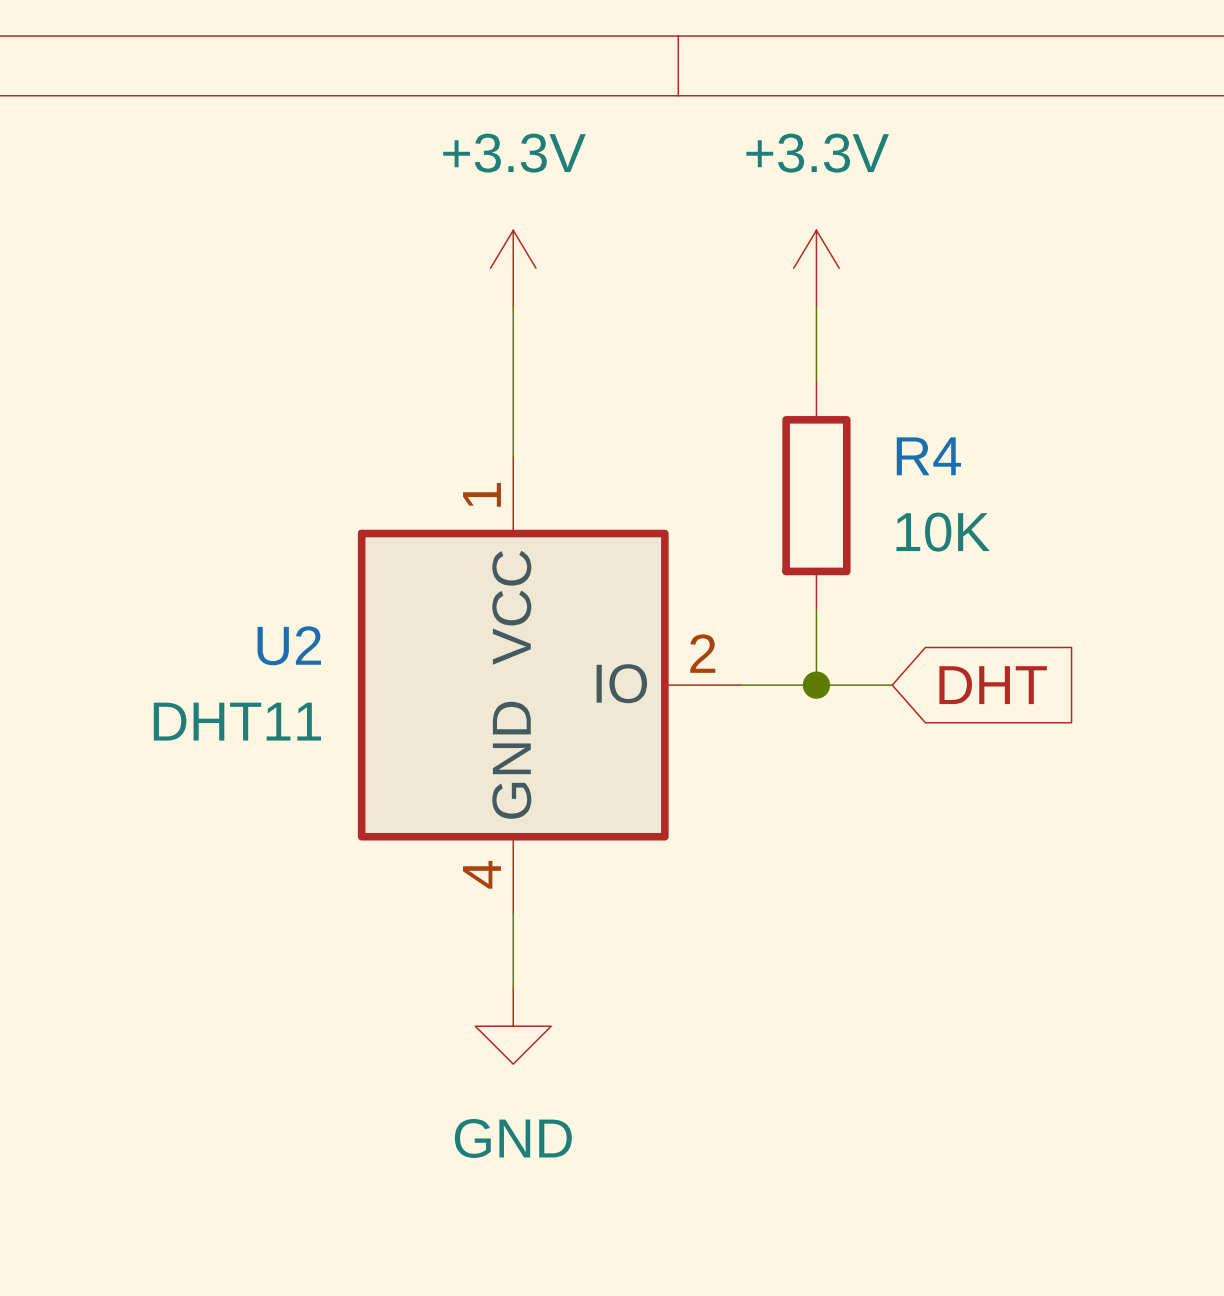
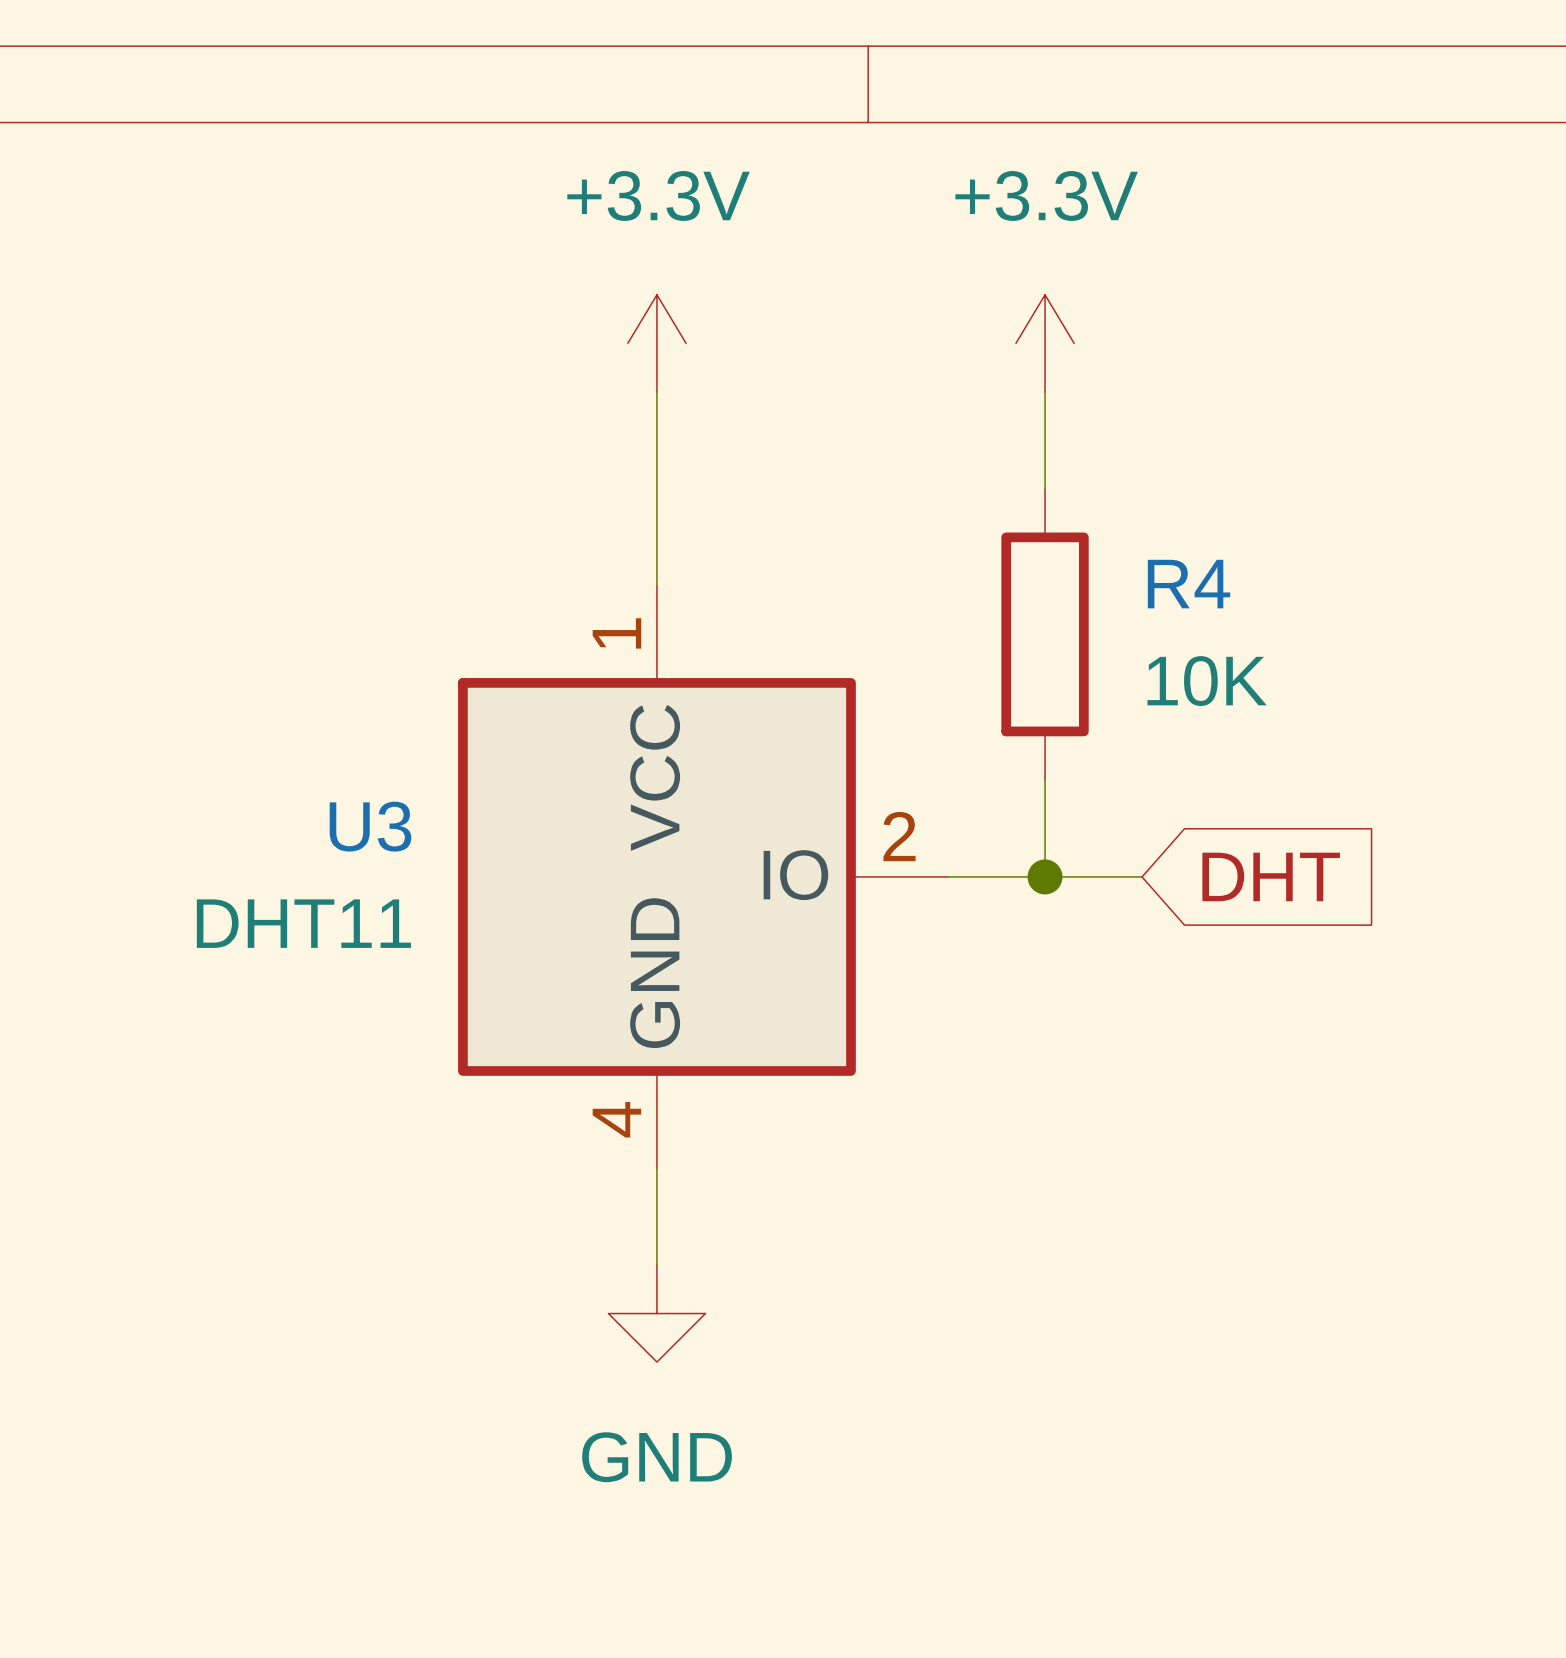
U2 name: U2 (289, 645) -> U3 (370, 826)

